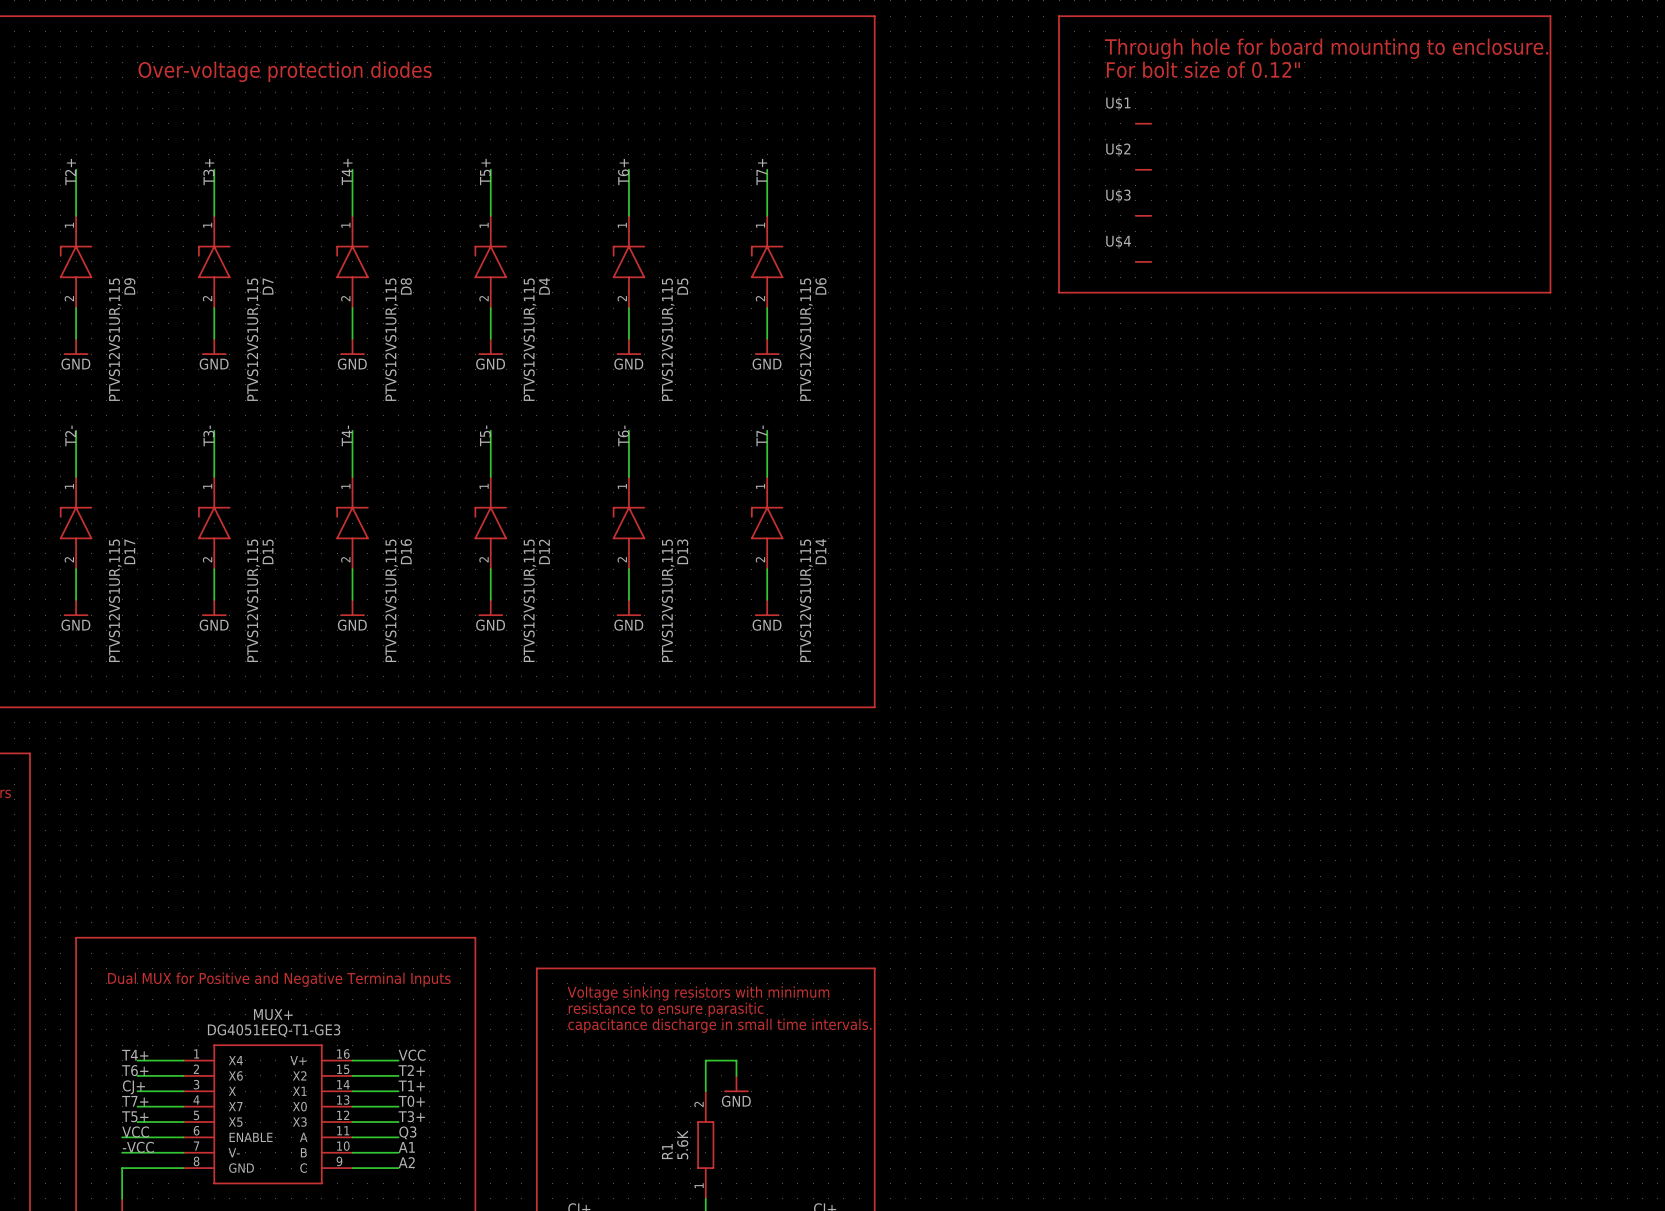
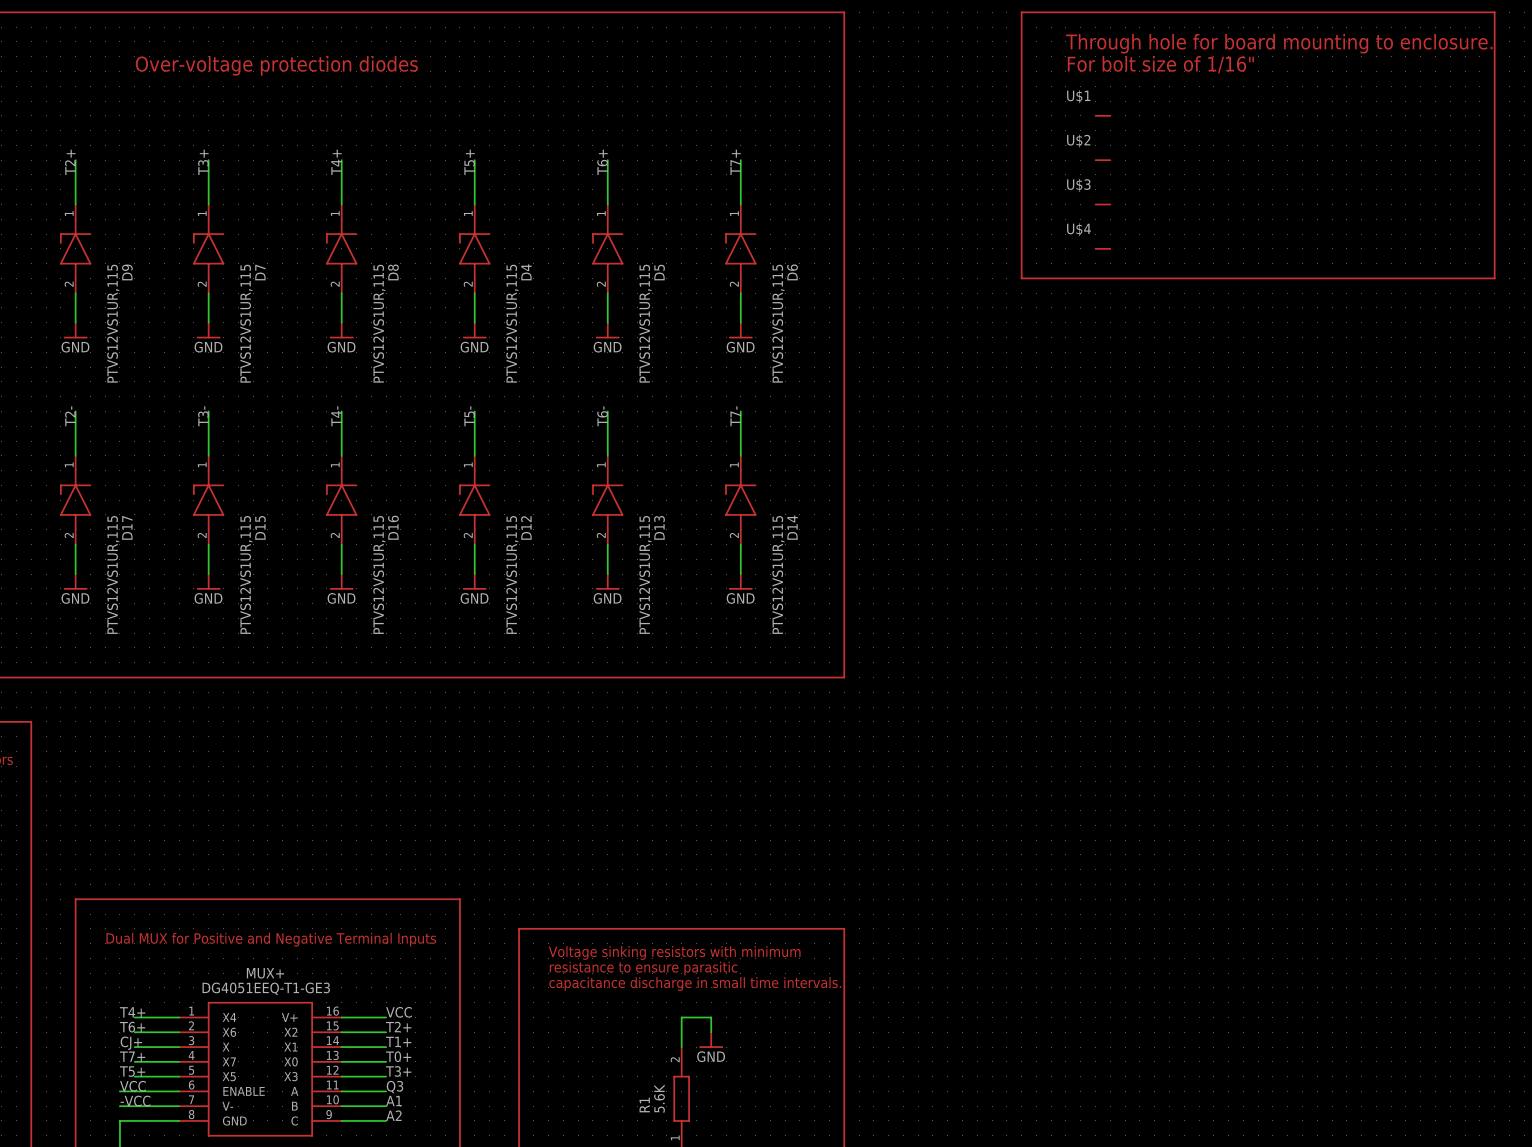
text: For bolt size of 0.12" (1203, 69) -> For bolt size of 1/16" (1160, 64)

